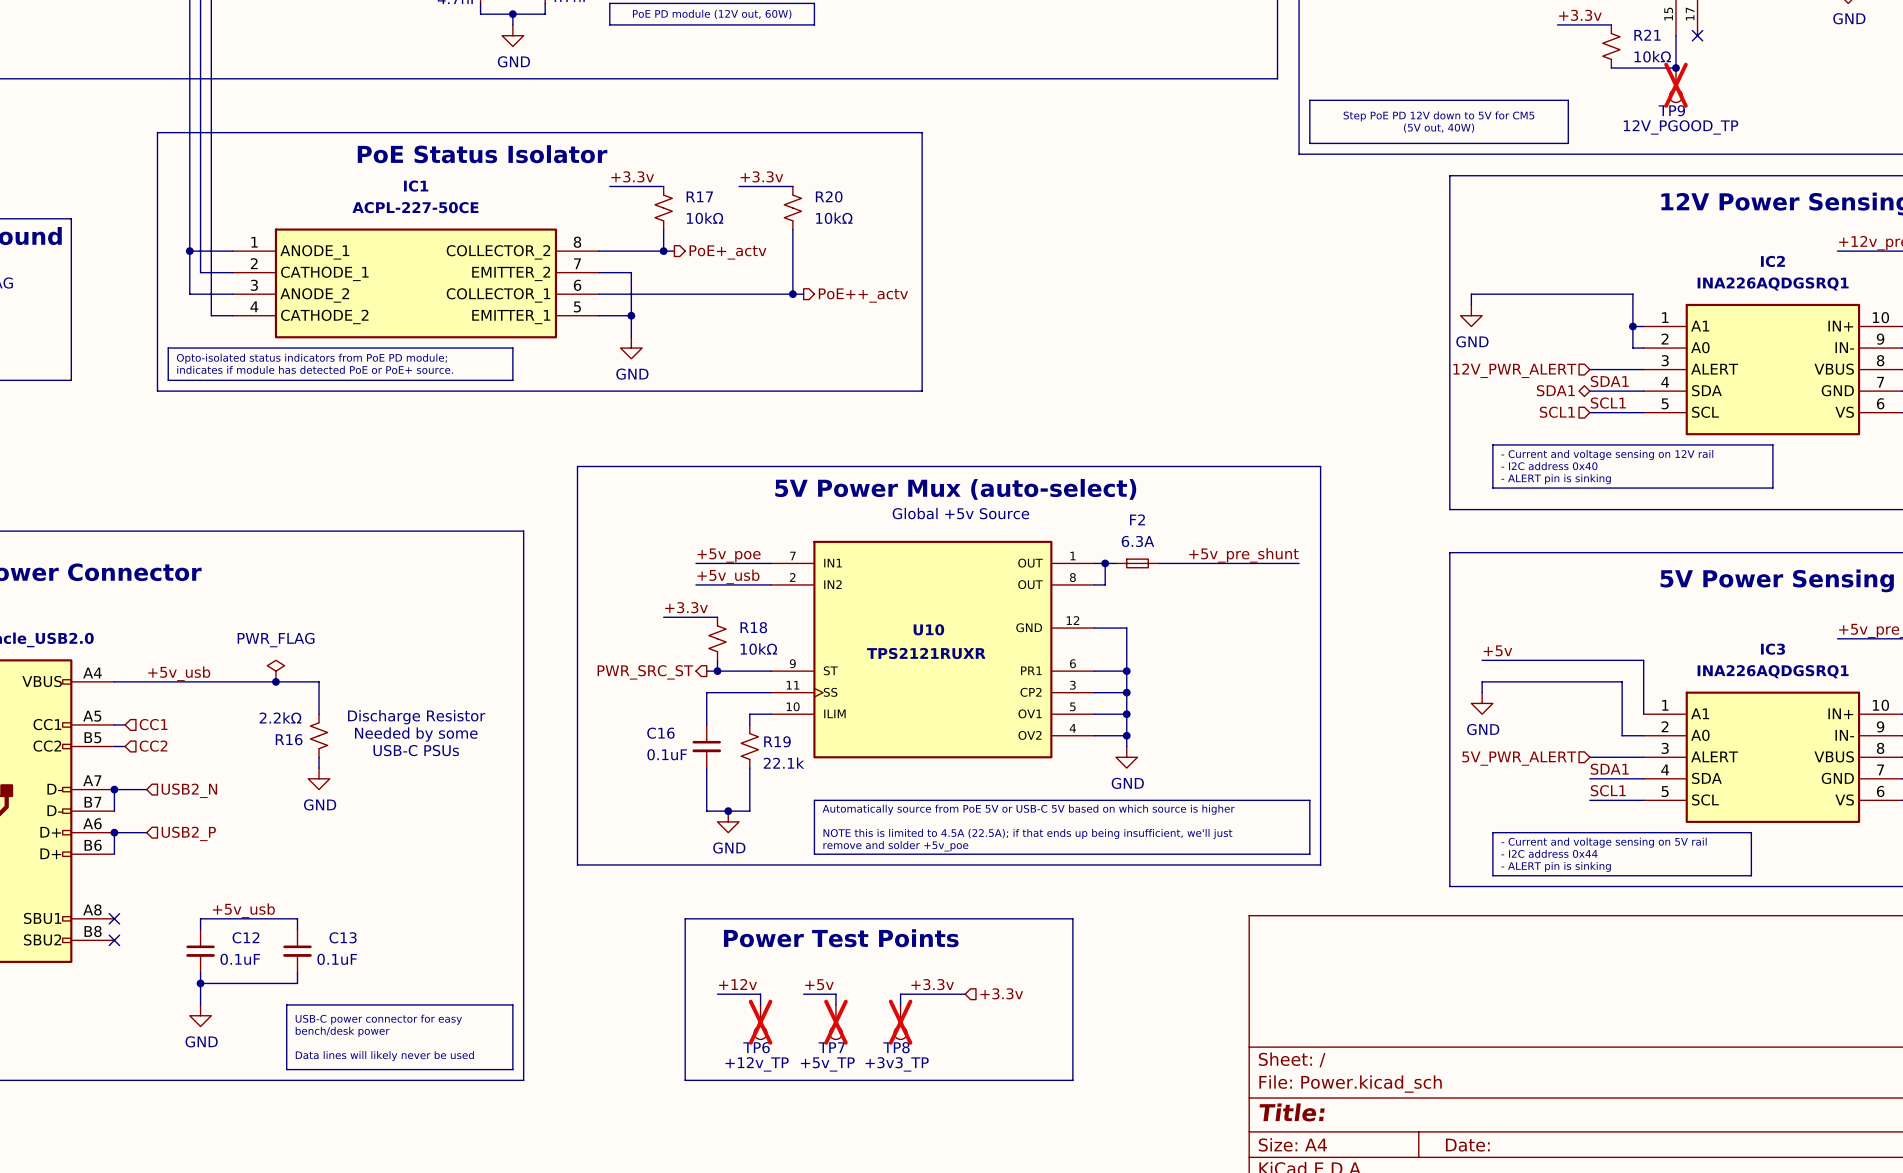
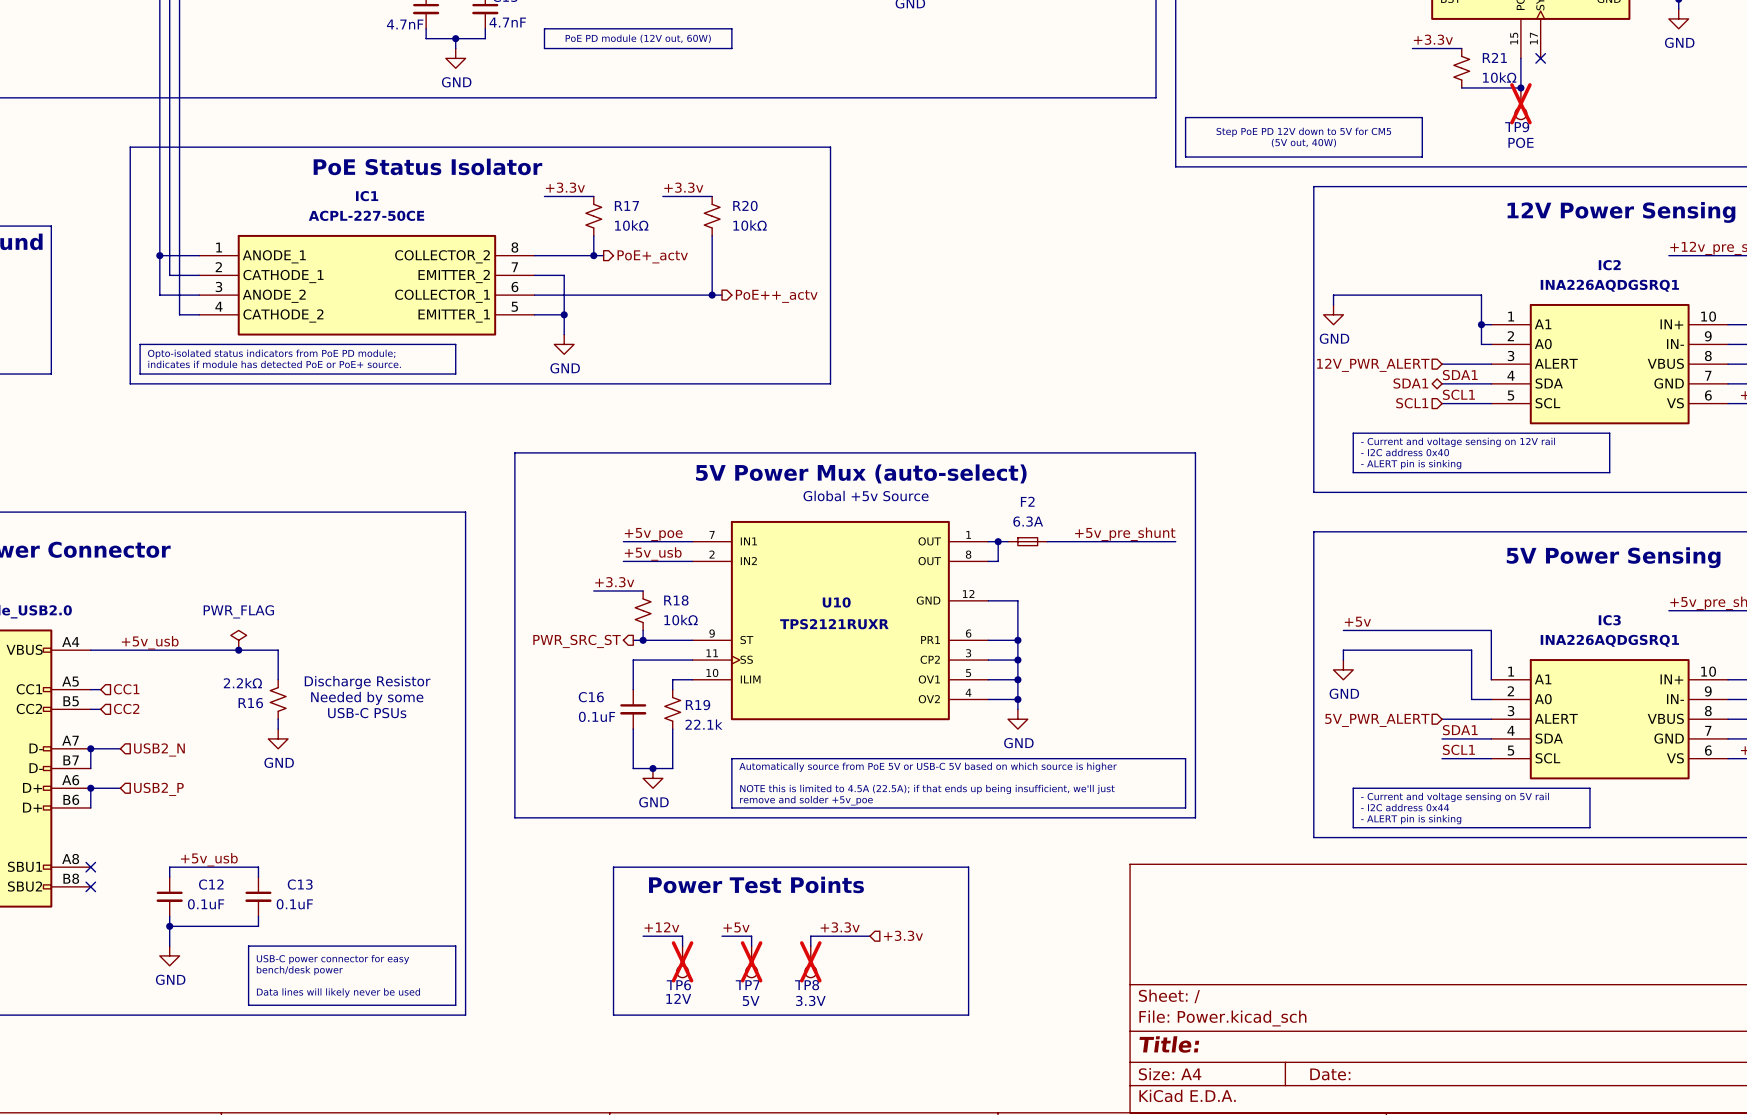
TP9 value: 12V_PGOOD_TP (1680, 127) -> POE (1521, 142)
TP6 value: +12v_TP (757, 1064) -> 12V (678, 998)
TP7 value: +5v_TP (827, 1064) -> 5V (751, 1001)
TP8 value: +3v3_TP (897, 1064) -> 3.3V (810, 1000)

